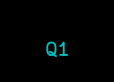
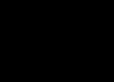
Q1 name: Q1 (57, 49) -> none

